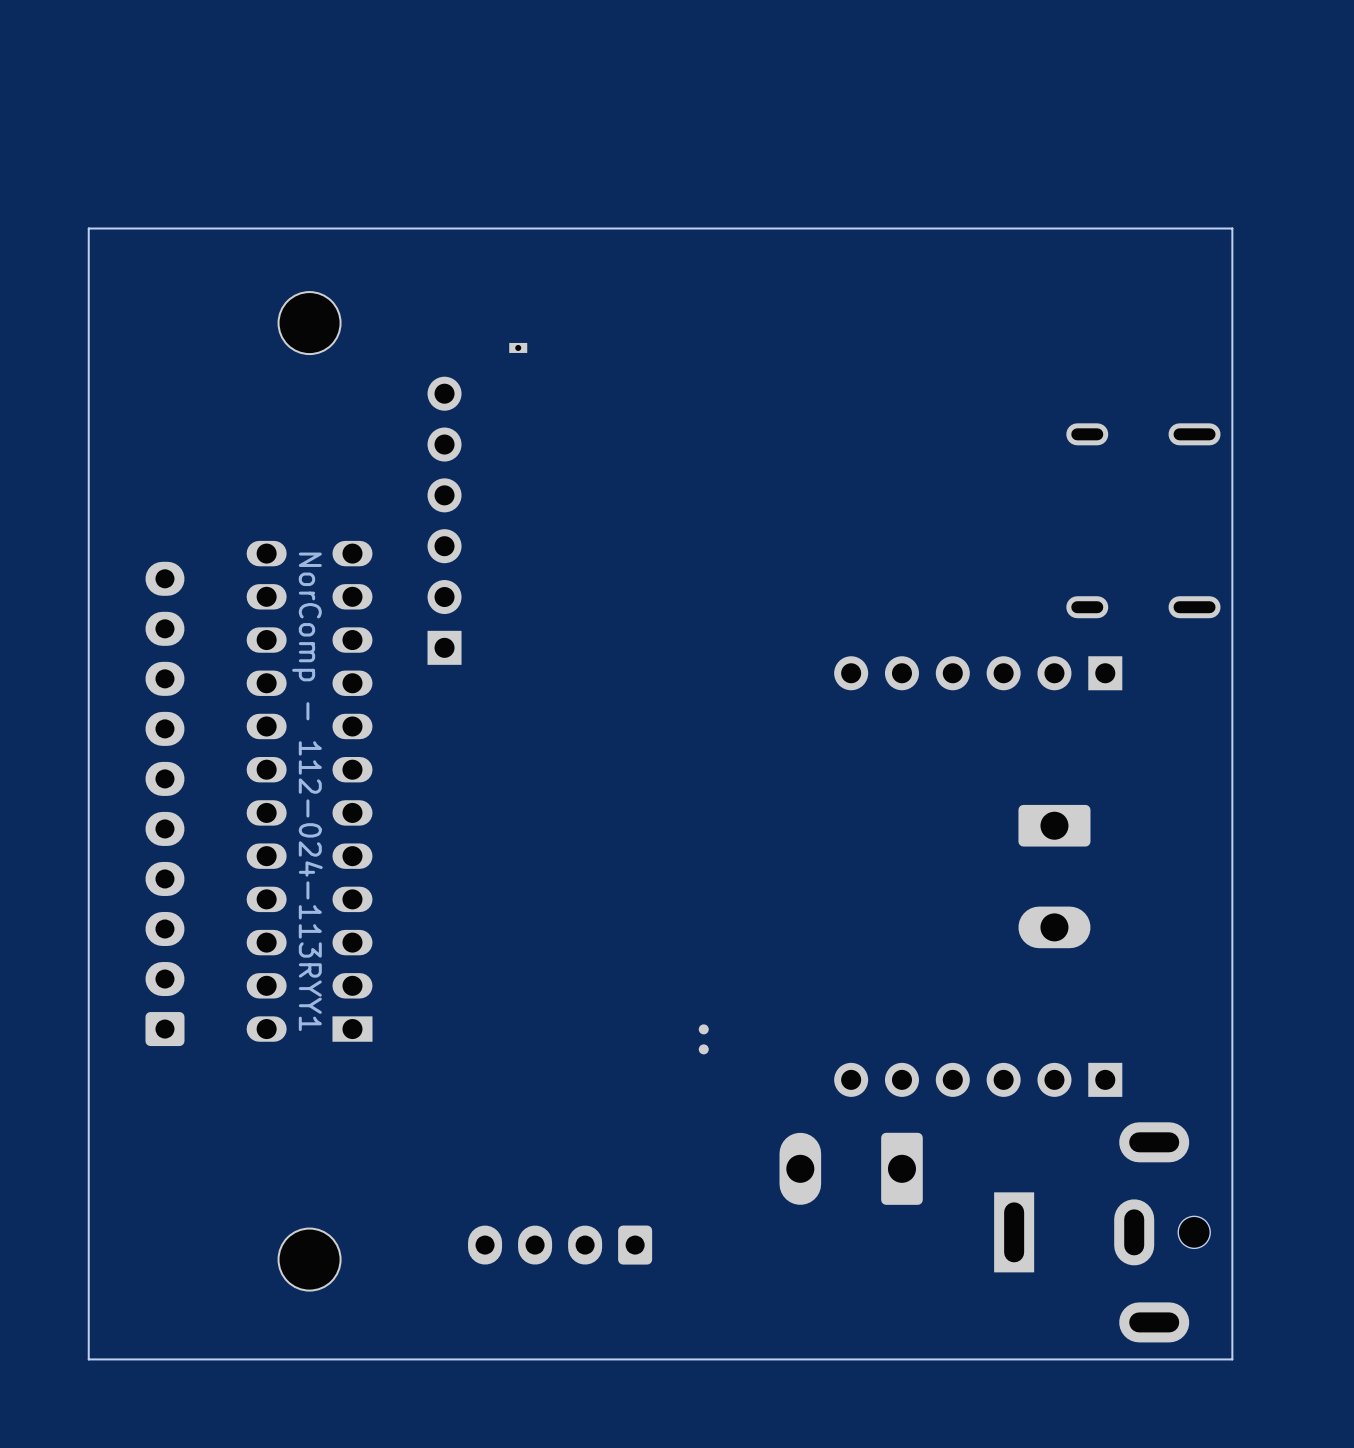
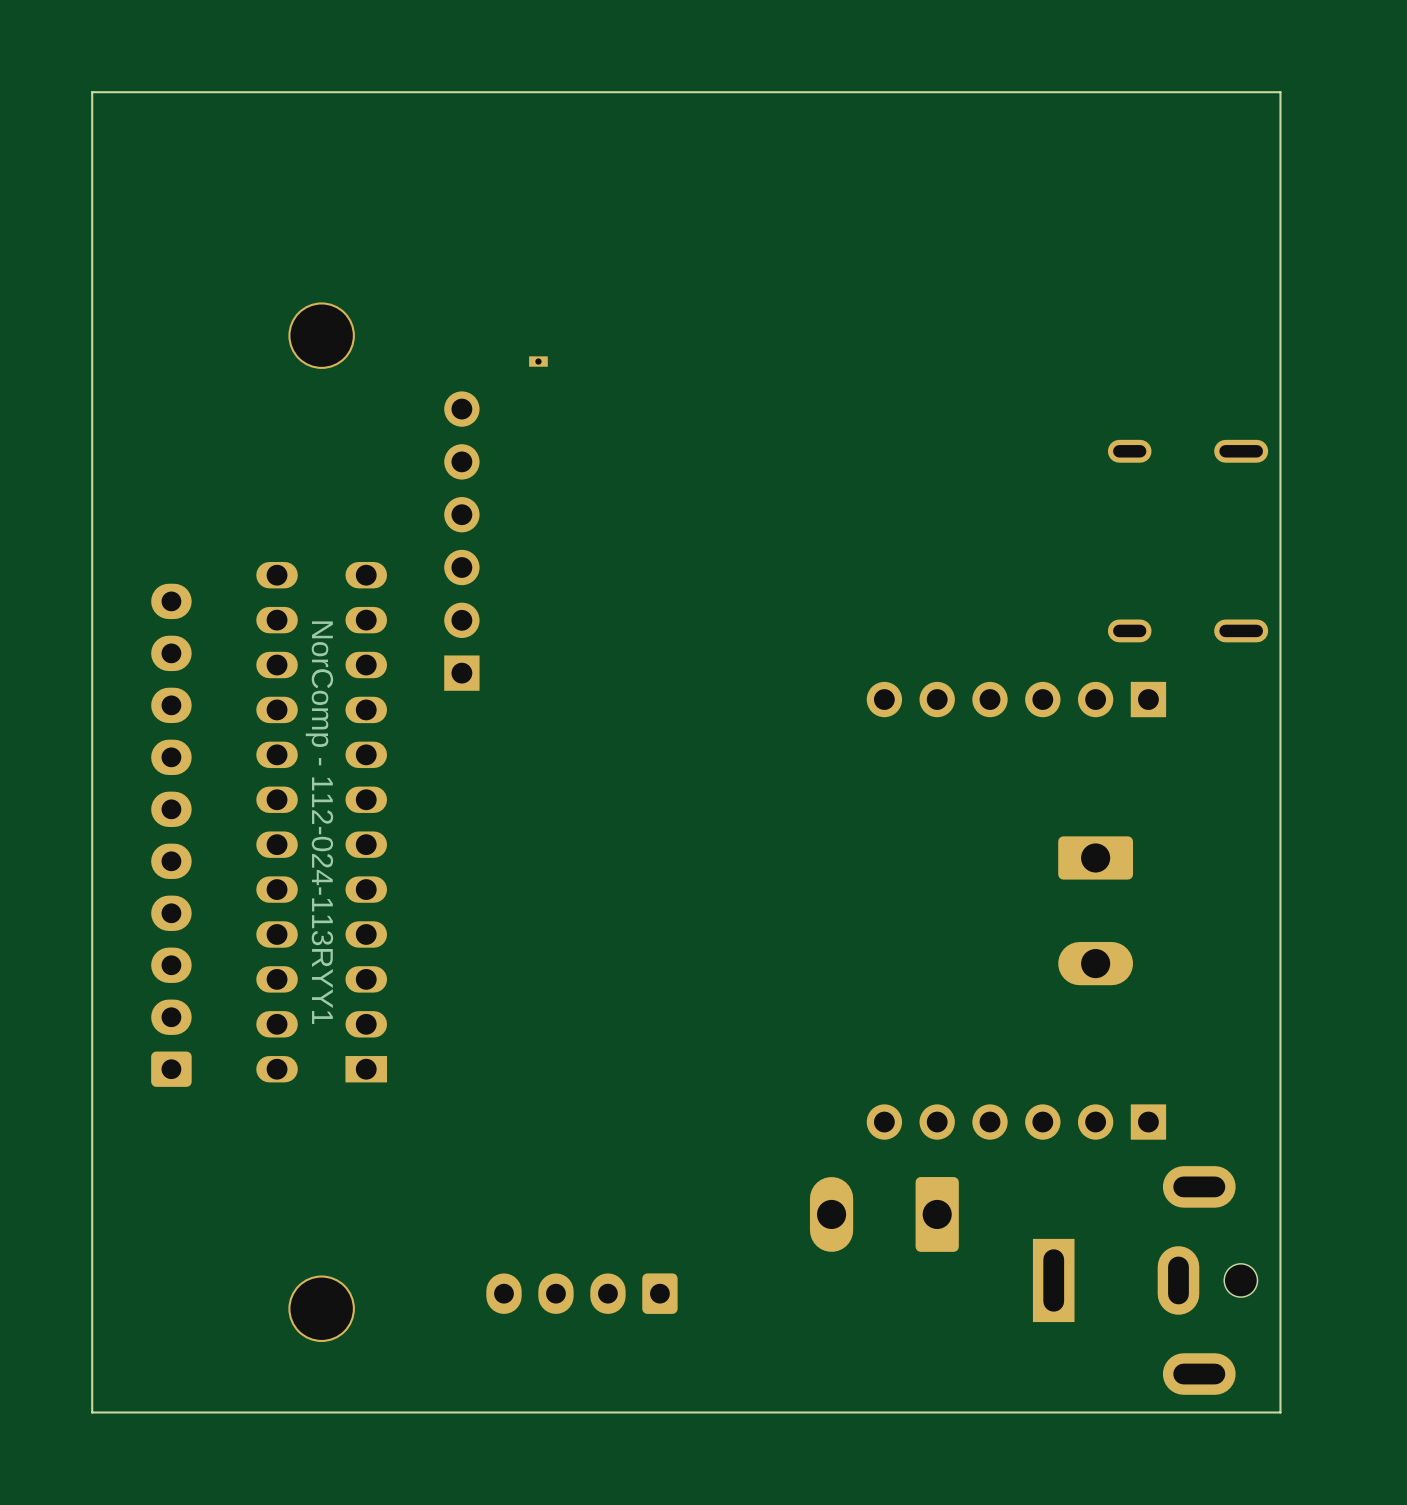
board edge: (1232, 228) (88, 228) -> (1280, 237) (1280, 92) (92, 92) (92, 237)
part: (703, 1039) -> none

